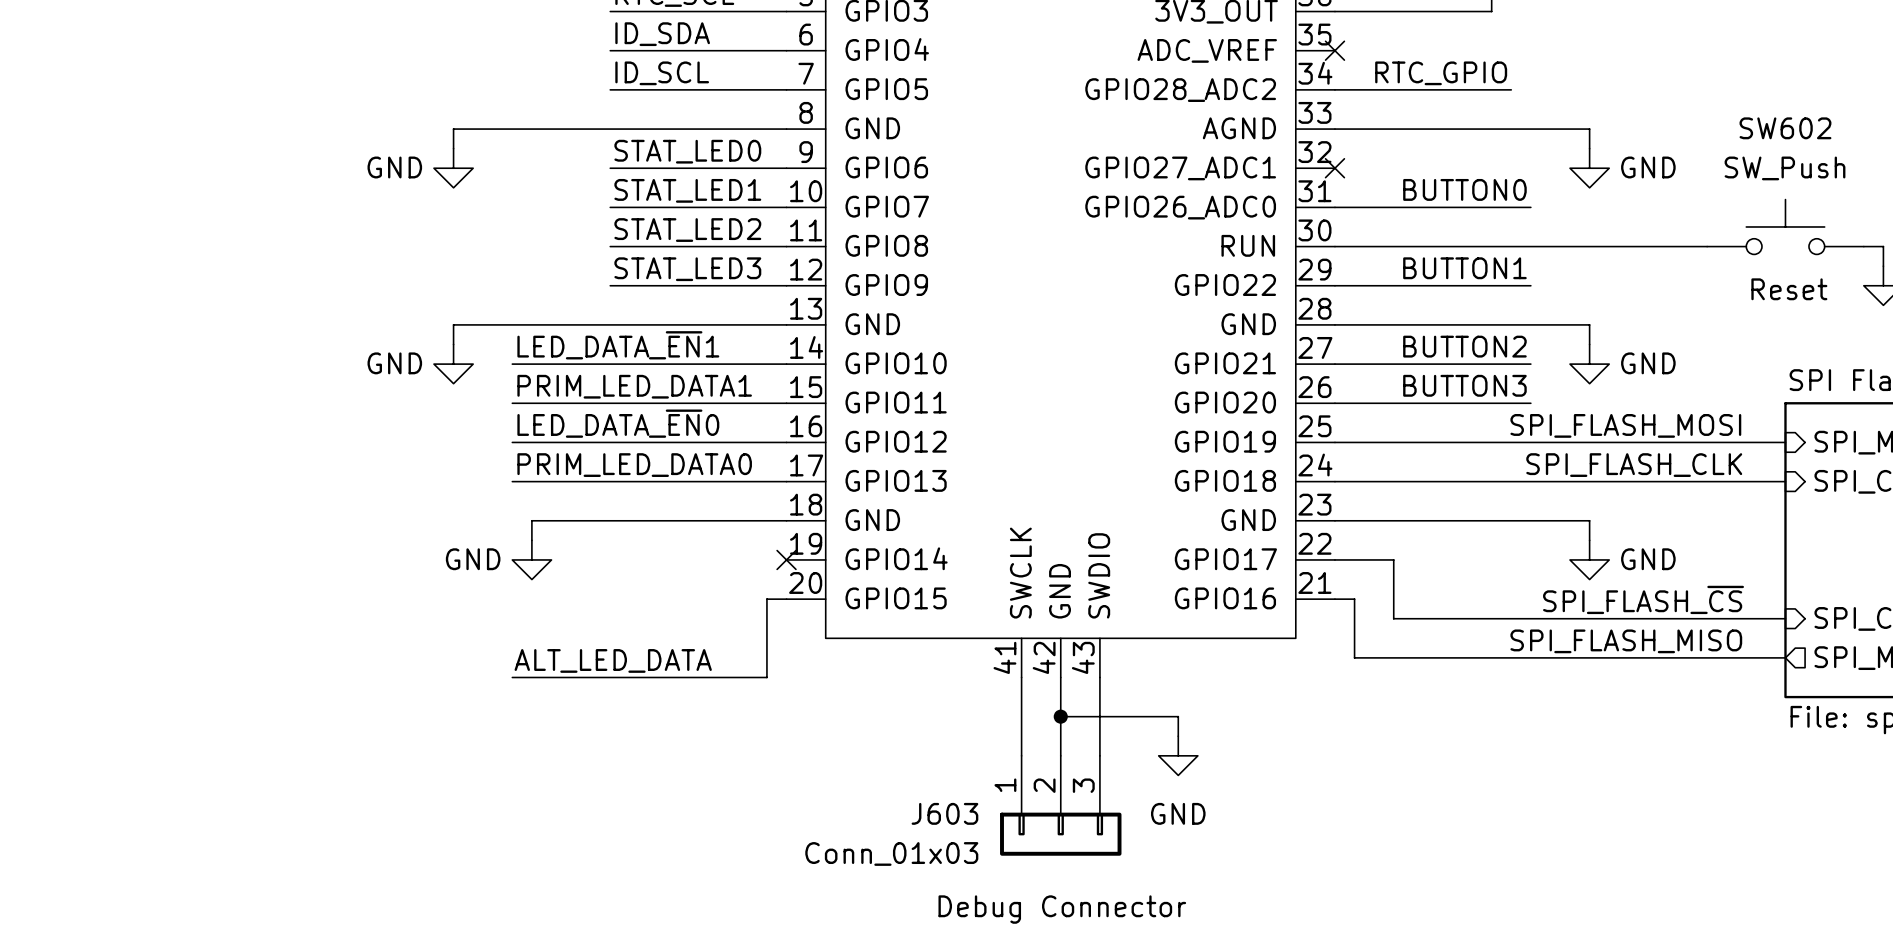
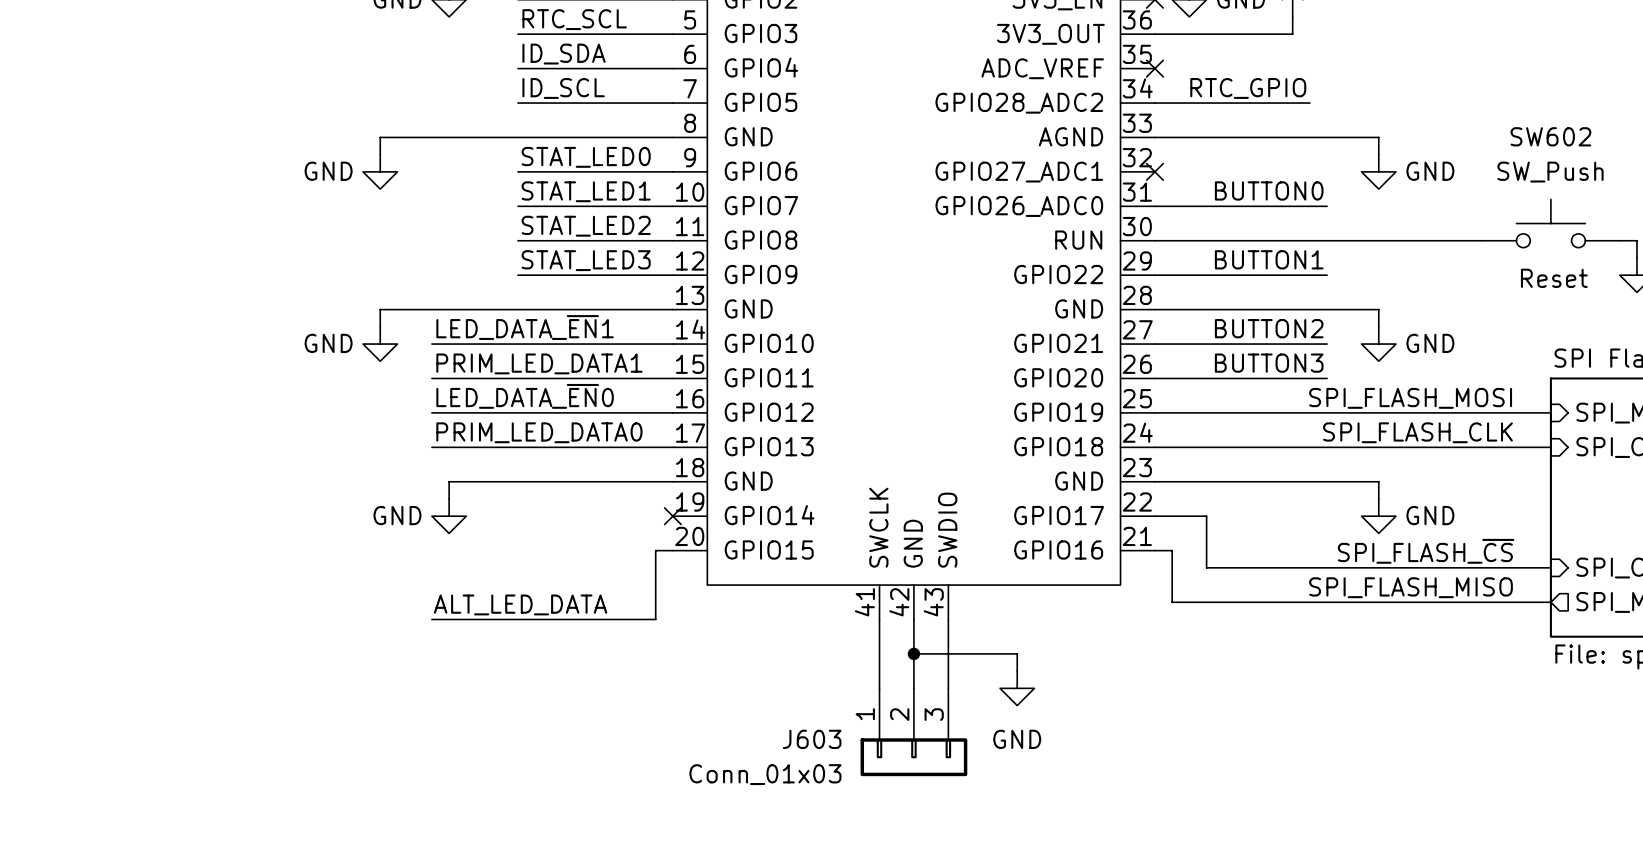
text: Debug Connector (1062, 909) -> none

